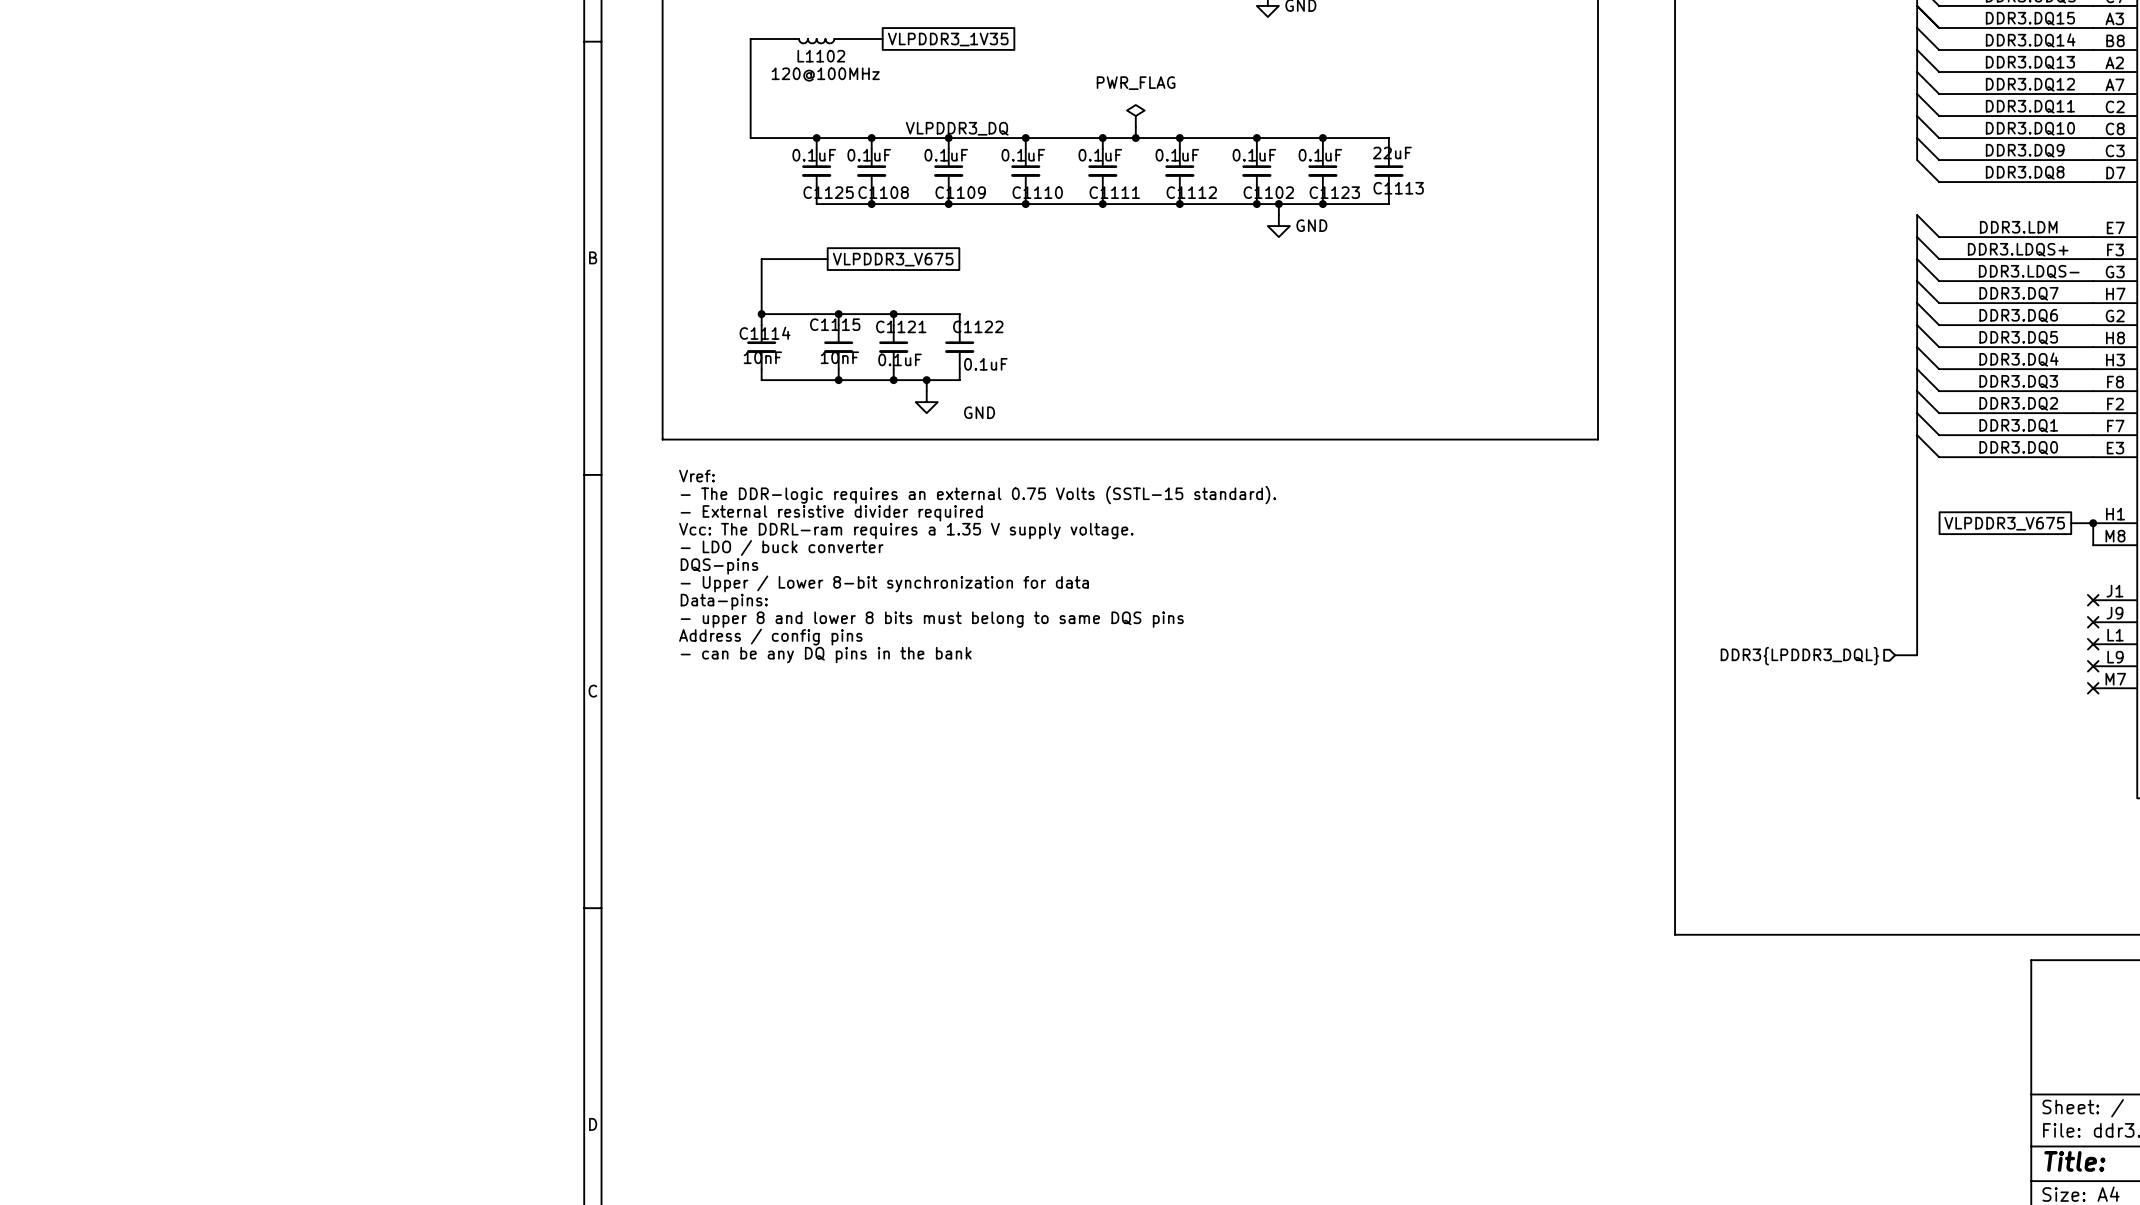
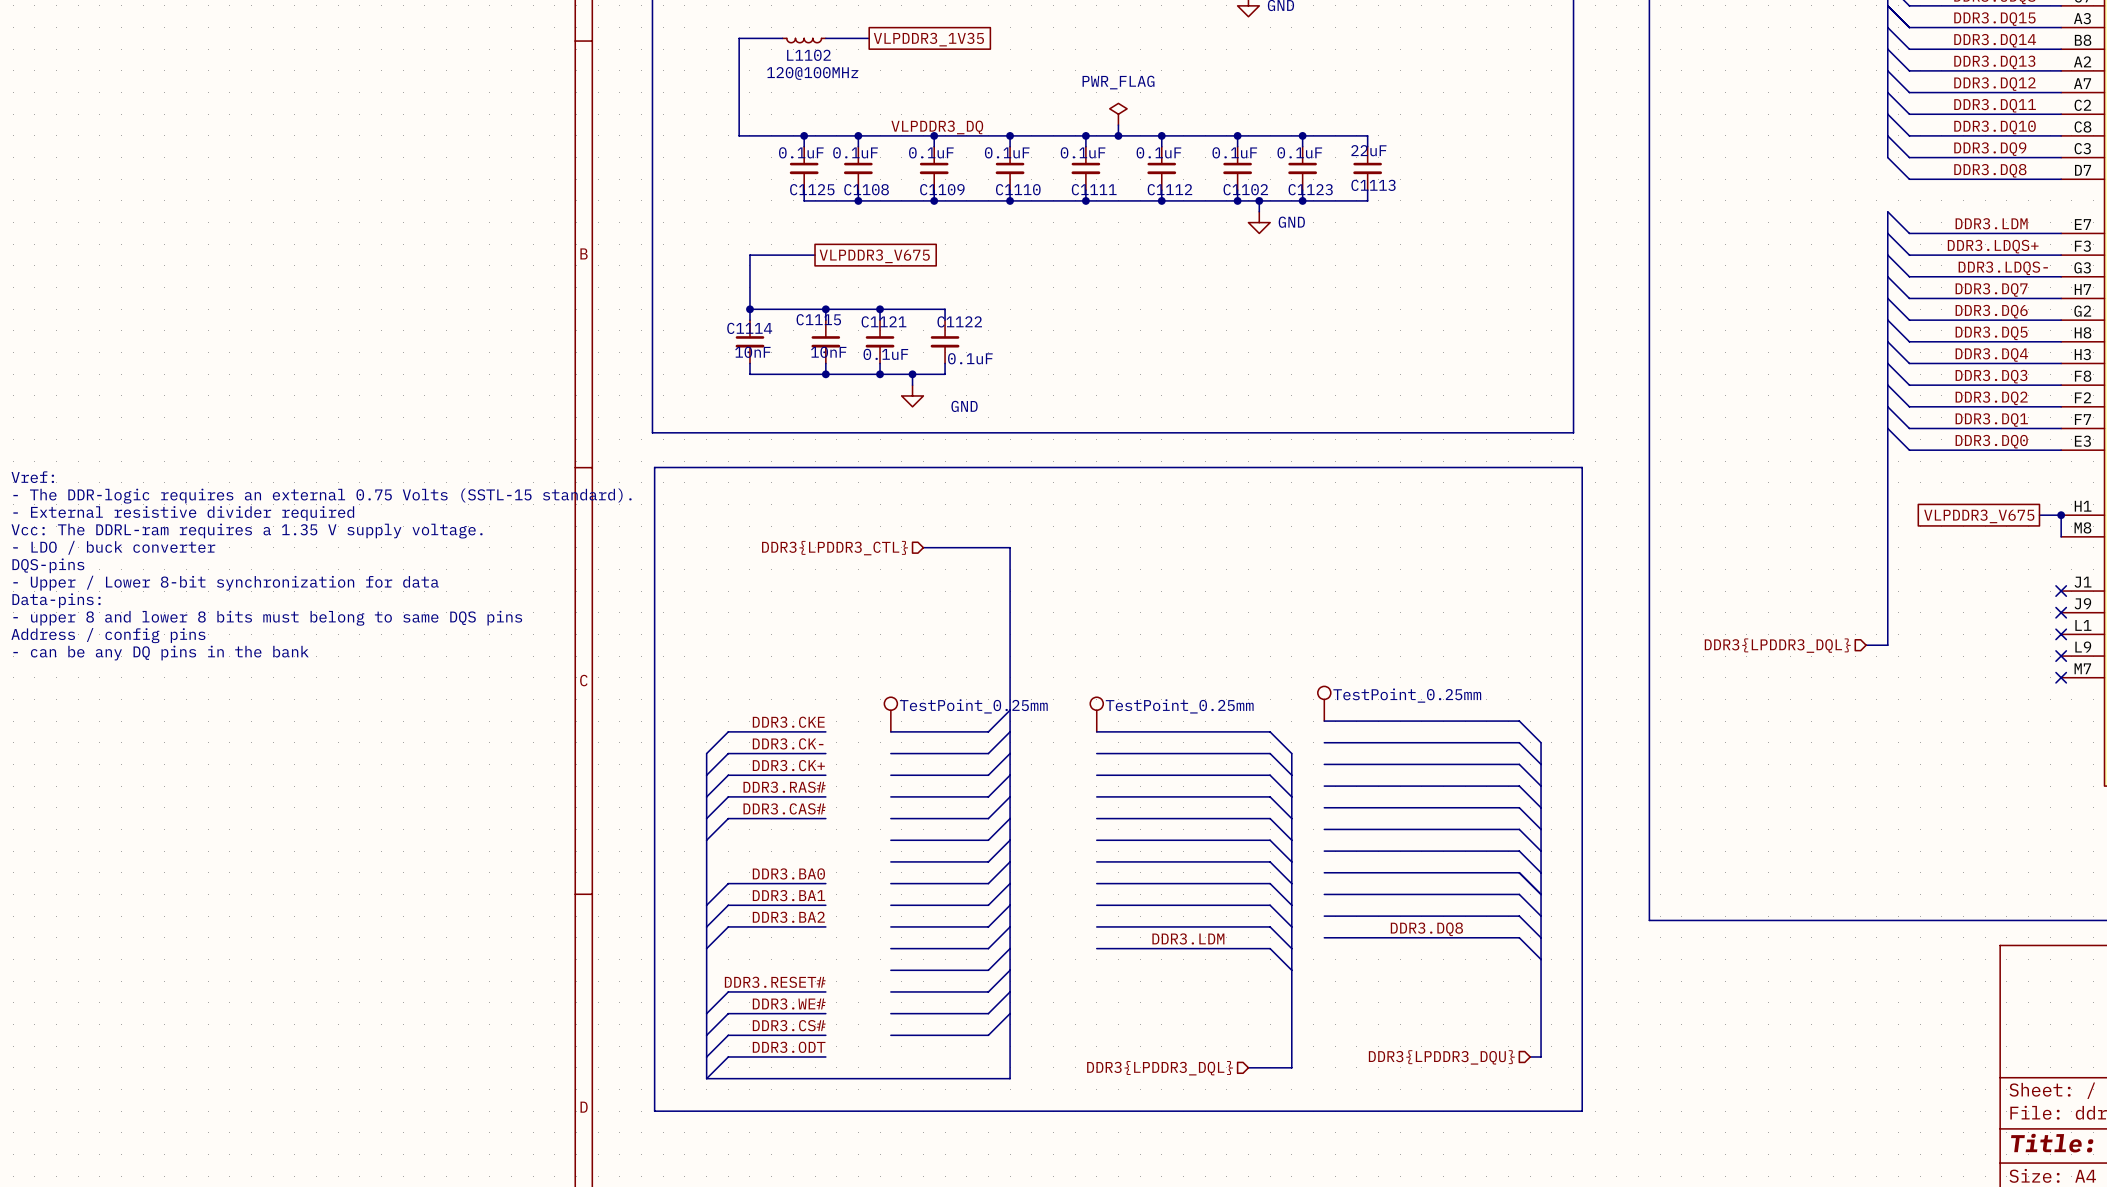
line: none -> (654, 467) (1582, 467) (1582, 1111) (654, 1111) (654, 467)
text: Vref: (696, 476) -> none
text: none -> Vref: (32, 477)
text: - The DDR-logic requires an external 0.75 Volts (SSTL-15 standard). (978, 495) -> none
text: none -> - The DDR-logic requires an external 0.75 Volts (SSTL-15 standard). (322, 496)
text: - External resistive divider required (831, 513) -> none
text: none -> - External resistive divider required (183, 513)
text: Vcc: The DDRL-ram requires a 1.35 V supply voltage. (906, 531) -> none
text: none -> Vcc: The DDRL-ram requires a 1.35 V supply voltage. (247, 531)
text: - LDO / buck converter (782, 547) -> none
text: none -> - LDO / buck converter (114, 547)
bus: none -> (923, 547) (1010, 547) (1010, 1078) (706, 1078) (706, 753)
hierarchical label: none -> DDR3{LPDDR3_CTL} (835, 548)
text: DQS-pins (719, 566) -> none
text: none -> DQS-pins (48, 565)
text: - Upper / Lower 8-bit synchronization for data (884, 583) -> none
text: none -> - Upper / Lower 8-bit synchronization for data (226, 583)
text: Data-pins: (724, 601) -> none
text: none -> Data-pins: (56, 600)
text: - upper 8 and lower 8 bits must belong to same DQS pins (932, 619) -> none
text: none -> - upper 8 and lower 8 bits must belong to same DQS pins (267, 618)
text: Address / config pins (770, 637) -> none
text: none -> Address / config pins (108, 635)
text: - can be any DQ pins in the bank (826, 655) -> none
text: none -> - can be any DQ pins in the bank (161, 653)
part: none -> TestPoint_0.25mm (1324, 703)
wire: none -> (1010, 710) (988, 731) (890, 731)
part: none -> TestPoint_0.25mm (890, 714)
part: none -> TestPoint_0.25mm (1096, 714)
wire: none -> (1324, 721) (1519, 721) (1541, 742)
label: none -> DDR3.CKE (788, 722)
wire: none -> (825, 731) (728, 731) (706, 753)
wire: none -> (1010, 731) (988, 753) (890, 753)
wire: none -> (1096, 731) (1270, 731) (1291, 753)
wire: none -> (1324, 742) (1519, 742) (1541, 764)
bus: none -> (1541, 742) (1541, 1056) (1530, 1056)
label: none -> DDR3.CK- (788, 743)
wire: none -> (825, 753) (728, 753) (706, 775)
wire: none -> (1010, 753) (988, 775) (890, 775)
wire: none -> (1096, 753) (1270, 753) (1291, 775)
bus: none -> (1291, 753) (1291, 1067) (1248, 1067)
wire: none -> (1324, 764) (1519, 764) (1541, 786)
label: none -> DDR3.CK+ (788, 765)
wire: none -> (825, 775) (728, 775) (706, 796)
wire: none -> (1010, 775) (988, 796) (890, 796)
wire: none -> (1096, 775) (1270, 775) (1291, 796)
wire: none -> (1324, 786) (1519, 786) (1541, 807)
label: none -> DDR3.RAS# (784, 787)
wire: none -> (825, 796) (728, 796) (706, 818)
wire: none -> (1010, 796) (988, 818) (890, 818)
wire: none -> (1096, 796) (1270, 796) (1291, 818)
wire: none -> (1324, 807) (1519, 807) (1541, 829)
label: none -> DDR3.CAS# (784, 808)
wire: none -> (825, 818) (728, 818) (706, 840)
wire: none -> (1010, 818) (988, 840) (890, 840)
wire: none -> (1096, 818) (1270, 818) (1291, 840)
wire: none -> (1324, 829) (1519, 829) (1541, 851)
wire: none -> (1010, 840) (988, 861) (890, 861)
wire: none -> (1096, 840) (1270, 840) (1291, 861)
wire: none -> (1324, 851) (1519, 851) (1541, 872)
wire: none -> (1010, 861) (988, 883) (890, 883)
wire: none -> (1096, 861) (1270, 861) (1291, 883)
wire: none -> (1324, 872) (1519, 872) (1541, 894)
label: none -> DDR3.BA0 (788, 873)
wire: none -> (825, 883) (728, 883) (706, 905)
wire: none -> (1010, 883) (988, 905) (890, 905)
wire: none -> (1096, 883) (1270, 883) (1291, 905)
wire: none -> (1324, 894) (1519, 894) (1541, 916)
label: none -> DDR3.BA1 (788, 895)
wire: none -> (825, 905) (728, 905) (706, 926)
wire: none -> (1010, 905) (988, 926) (890, 926)
wire: none -> (1096, 905) (1270, 905) (1291, 926)
wire: none -> (1324, 916) (1519, 916) (1541, 937)
label: none -> DDR3.BA2 (788, 917)
wire: none -> (825, 926) (728, 926) (706, 948)
wire: none -> (1010, 926) (988, 948) (890, 948)
wire: none -> (1096, 926) (1270, 926) (1291, 948)
label: none -> DDR3.DQ8 (1426, 929)
wire: none -> (1324, 937) (1519, 937) (1541, 959)
label: none -> DDR3.LDM (1188, 938)
wire: none -> (1010, 948) (988, 970) (890, 970)
wire: none -> (1096, 948) (1270, 948) (1291, 970)
wire: none -> (1010, 970) (988, 991) (890, 991)
label: none -> DDR3.RESET# (775, 982)
wire: none -> (825, 991) (728, 991) (706, 1013)
wire: none -> (1010, 991) (988, 1013) (890, 1013)
label: none -> DDR3.WE# (789, 1003)
wire: none -> (825, 1013) (728, 1013) (706, 1035)
wire: none -> (1010, 1013) (988, 1035) (890, 1035)
label: none -> DDR3.CS# (789, 1025)
wire: none -> (825, 1035) (728, 1035) (706, 1056)
label: none -> DDR3.ODT (789, 1047)
wire: none -> (825, 1056) (728, 1056) (706, 1078)
hierarchical label: none -> DDR3{LPDDR3_DQU} (1441, 1057)
hierarchical label: none -> DDR3{LPDDR3_DQL} (1160, 1068)

